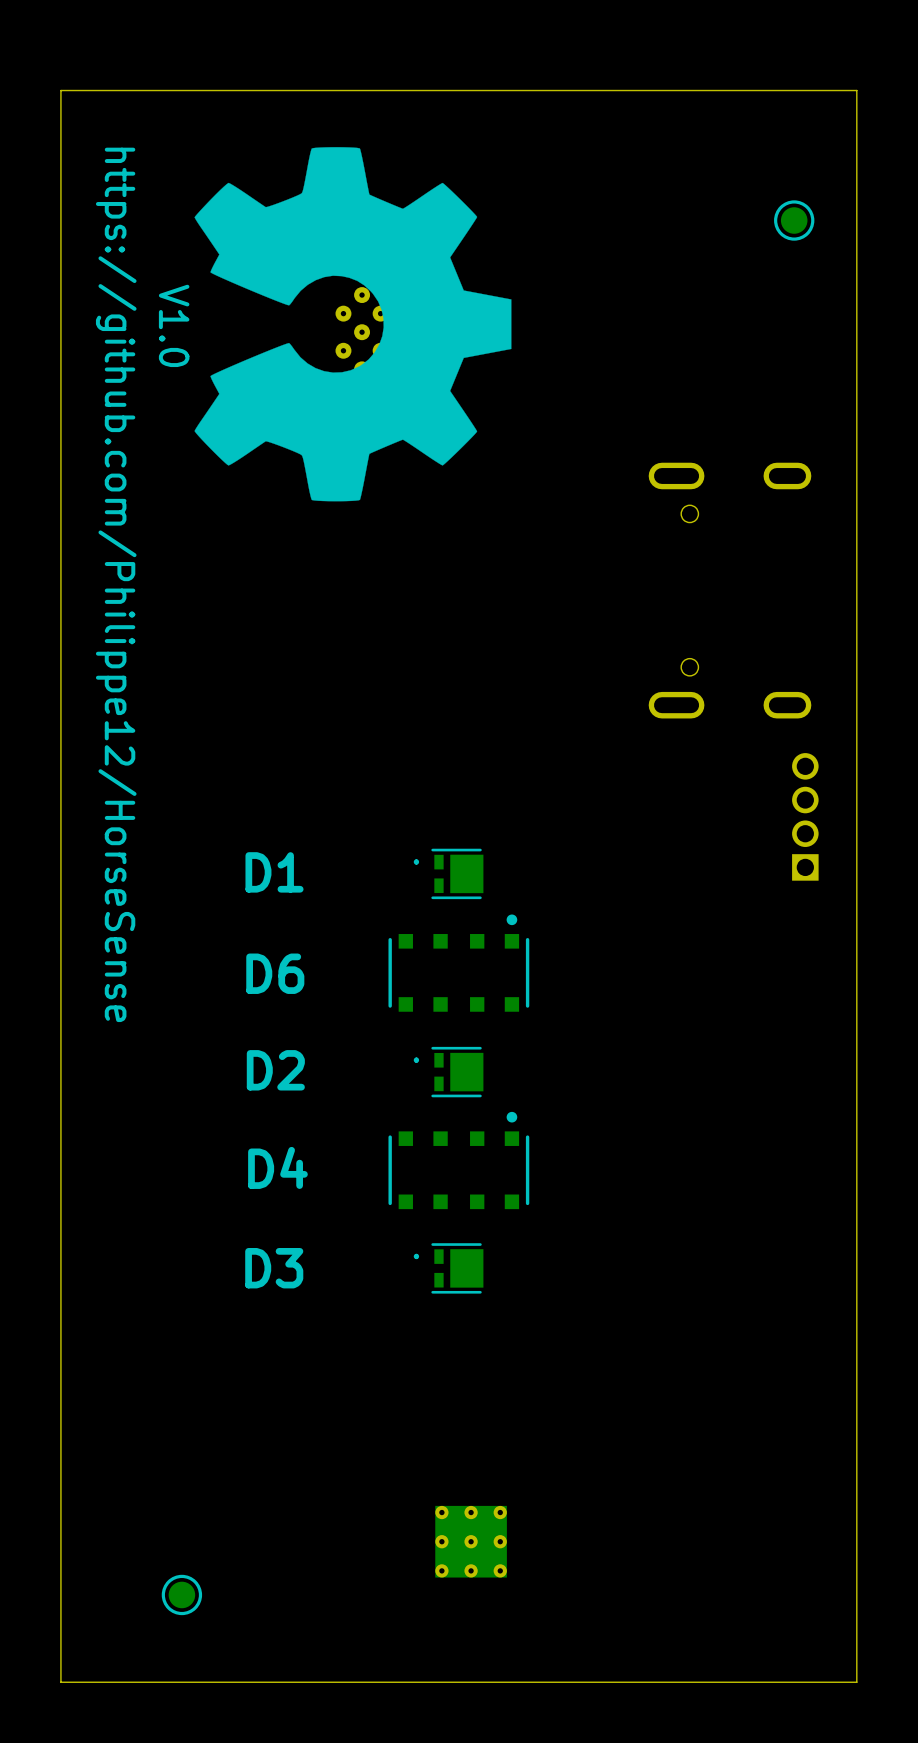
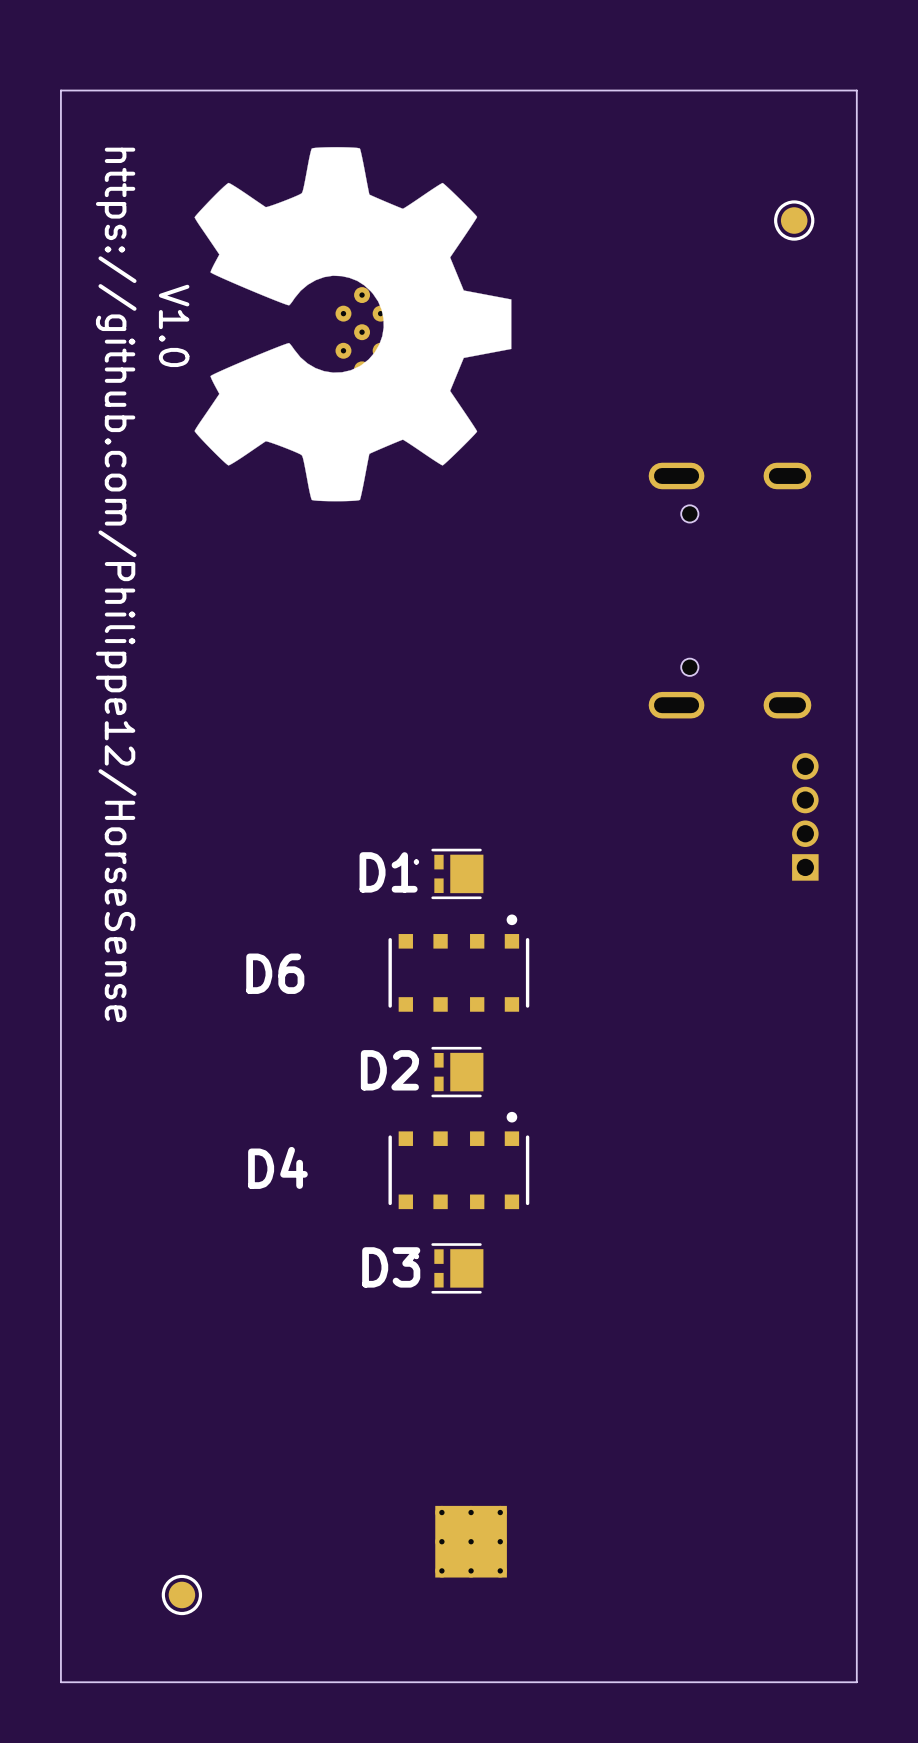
D1 name position: D1 (274, 872) -> D1 (388, 872)
D2 name position: D2 (275, 1070) -> D2 (389, 1070)
D3 name position: D3 (274, 1268) -> D3 (391, 1267)

